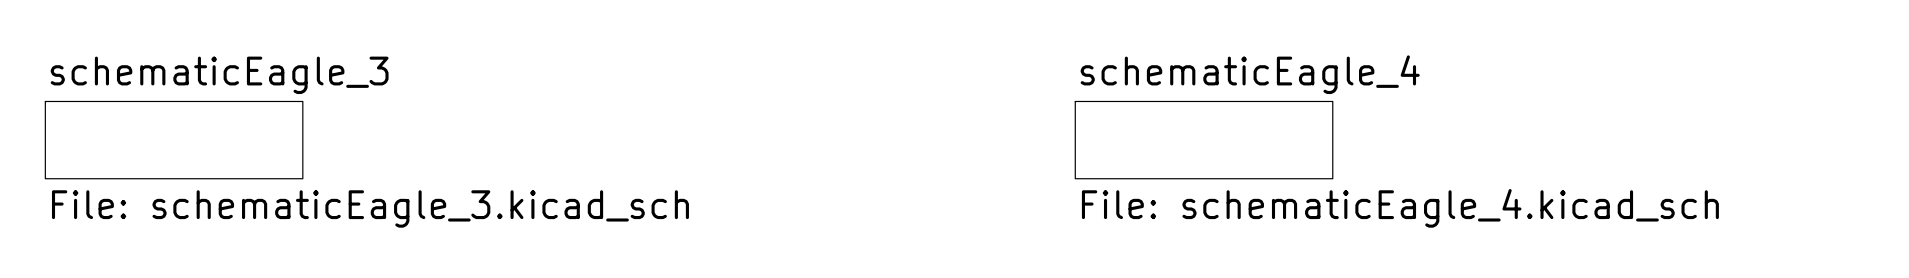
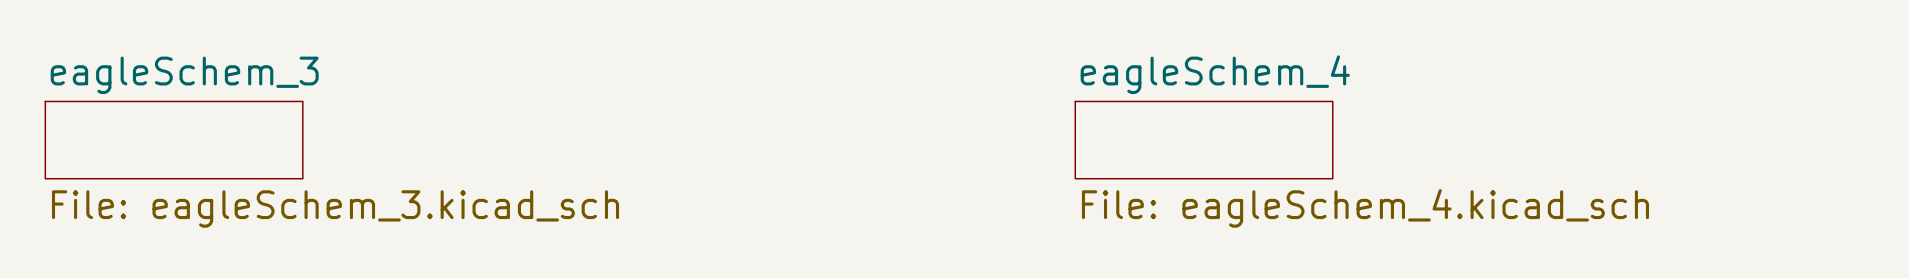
sheet schematicEagle_4 name: schematicEagle_4 (1250, 74) -> eagleSchem_4 (1215, 74)
sheet schematicEagle_3 name: schematicEagle_3 (219, 75) -> eagleSchem_3 (184, 75)
sheet schematicEagle_3 value: File: schematicEagle_3.kicad_sch (370, 208) -> File: eagleSchem_3.kicad_sch (335, 208)
sheet schematicEagle_4 value: File: schematicEagle_4.kicad_sch (1400, 208) -> File: eagleSchem_4.kicad_sch (1365, 208)

